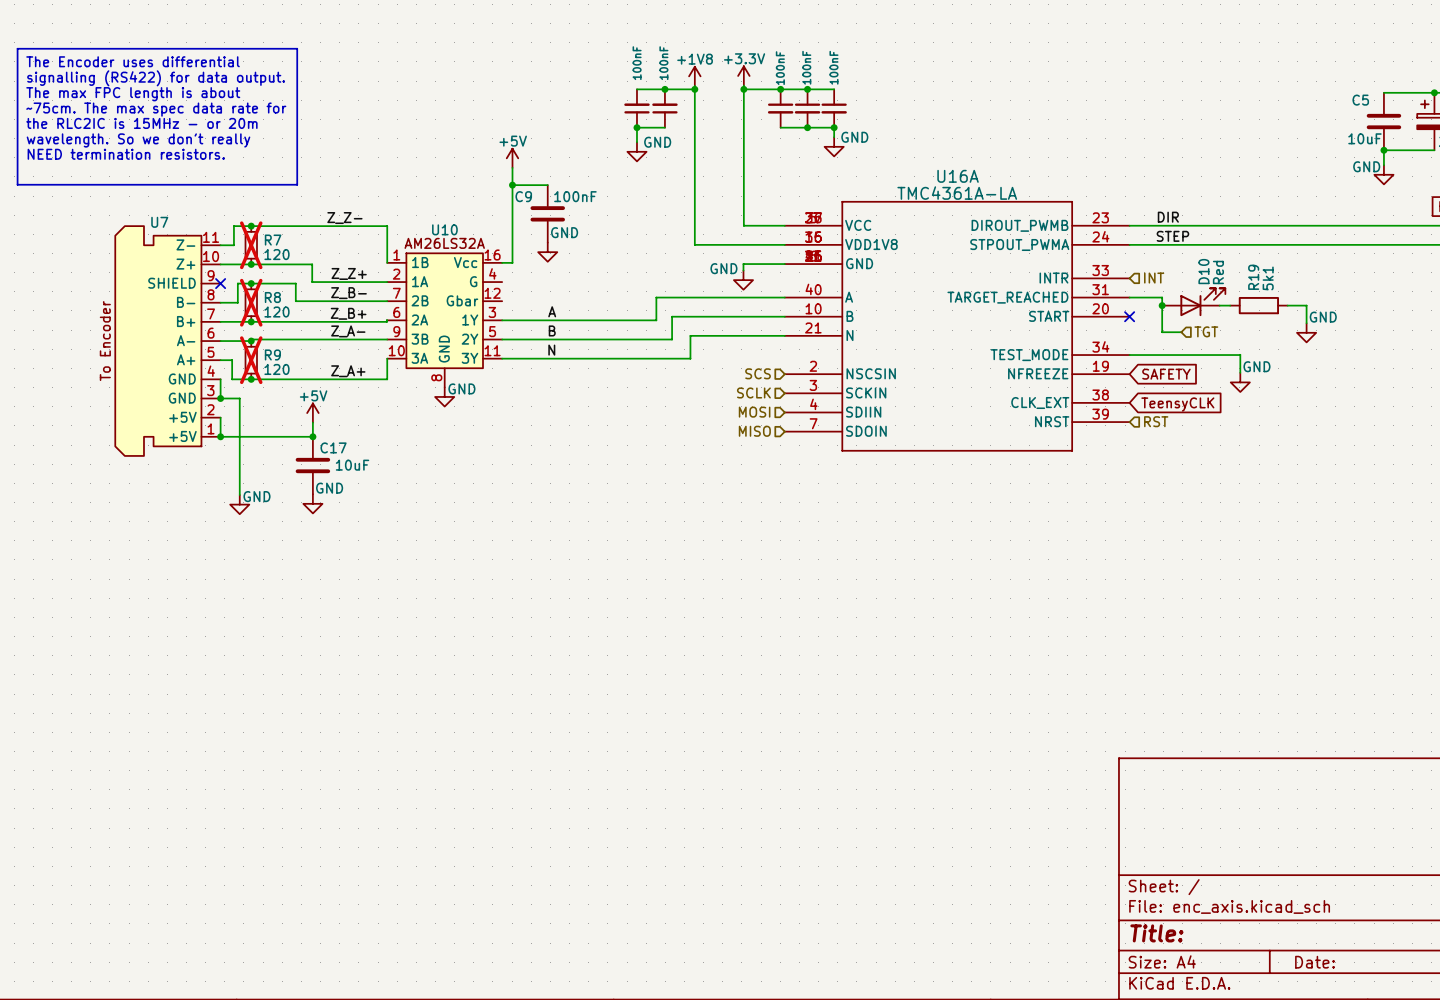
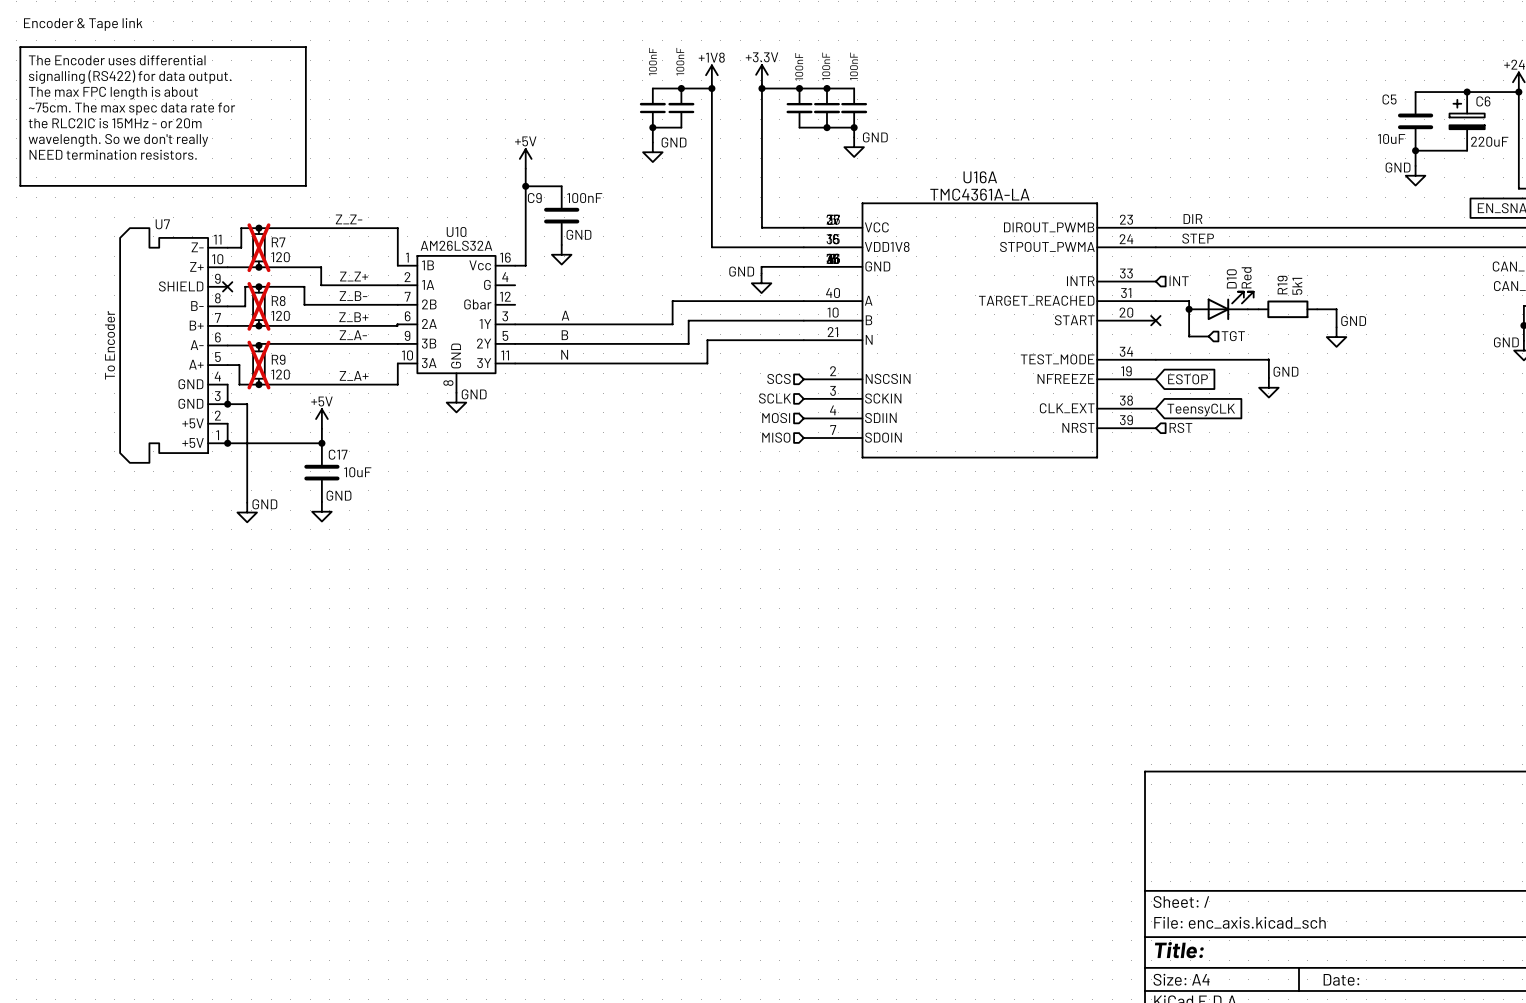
text: none -> Encoder & Tape link (83, 24)
global label: SAFETY (1166, 374) -> ESTOP (1188, 379)

